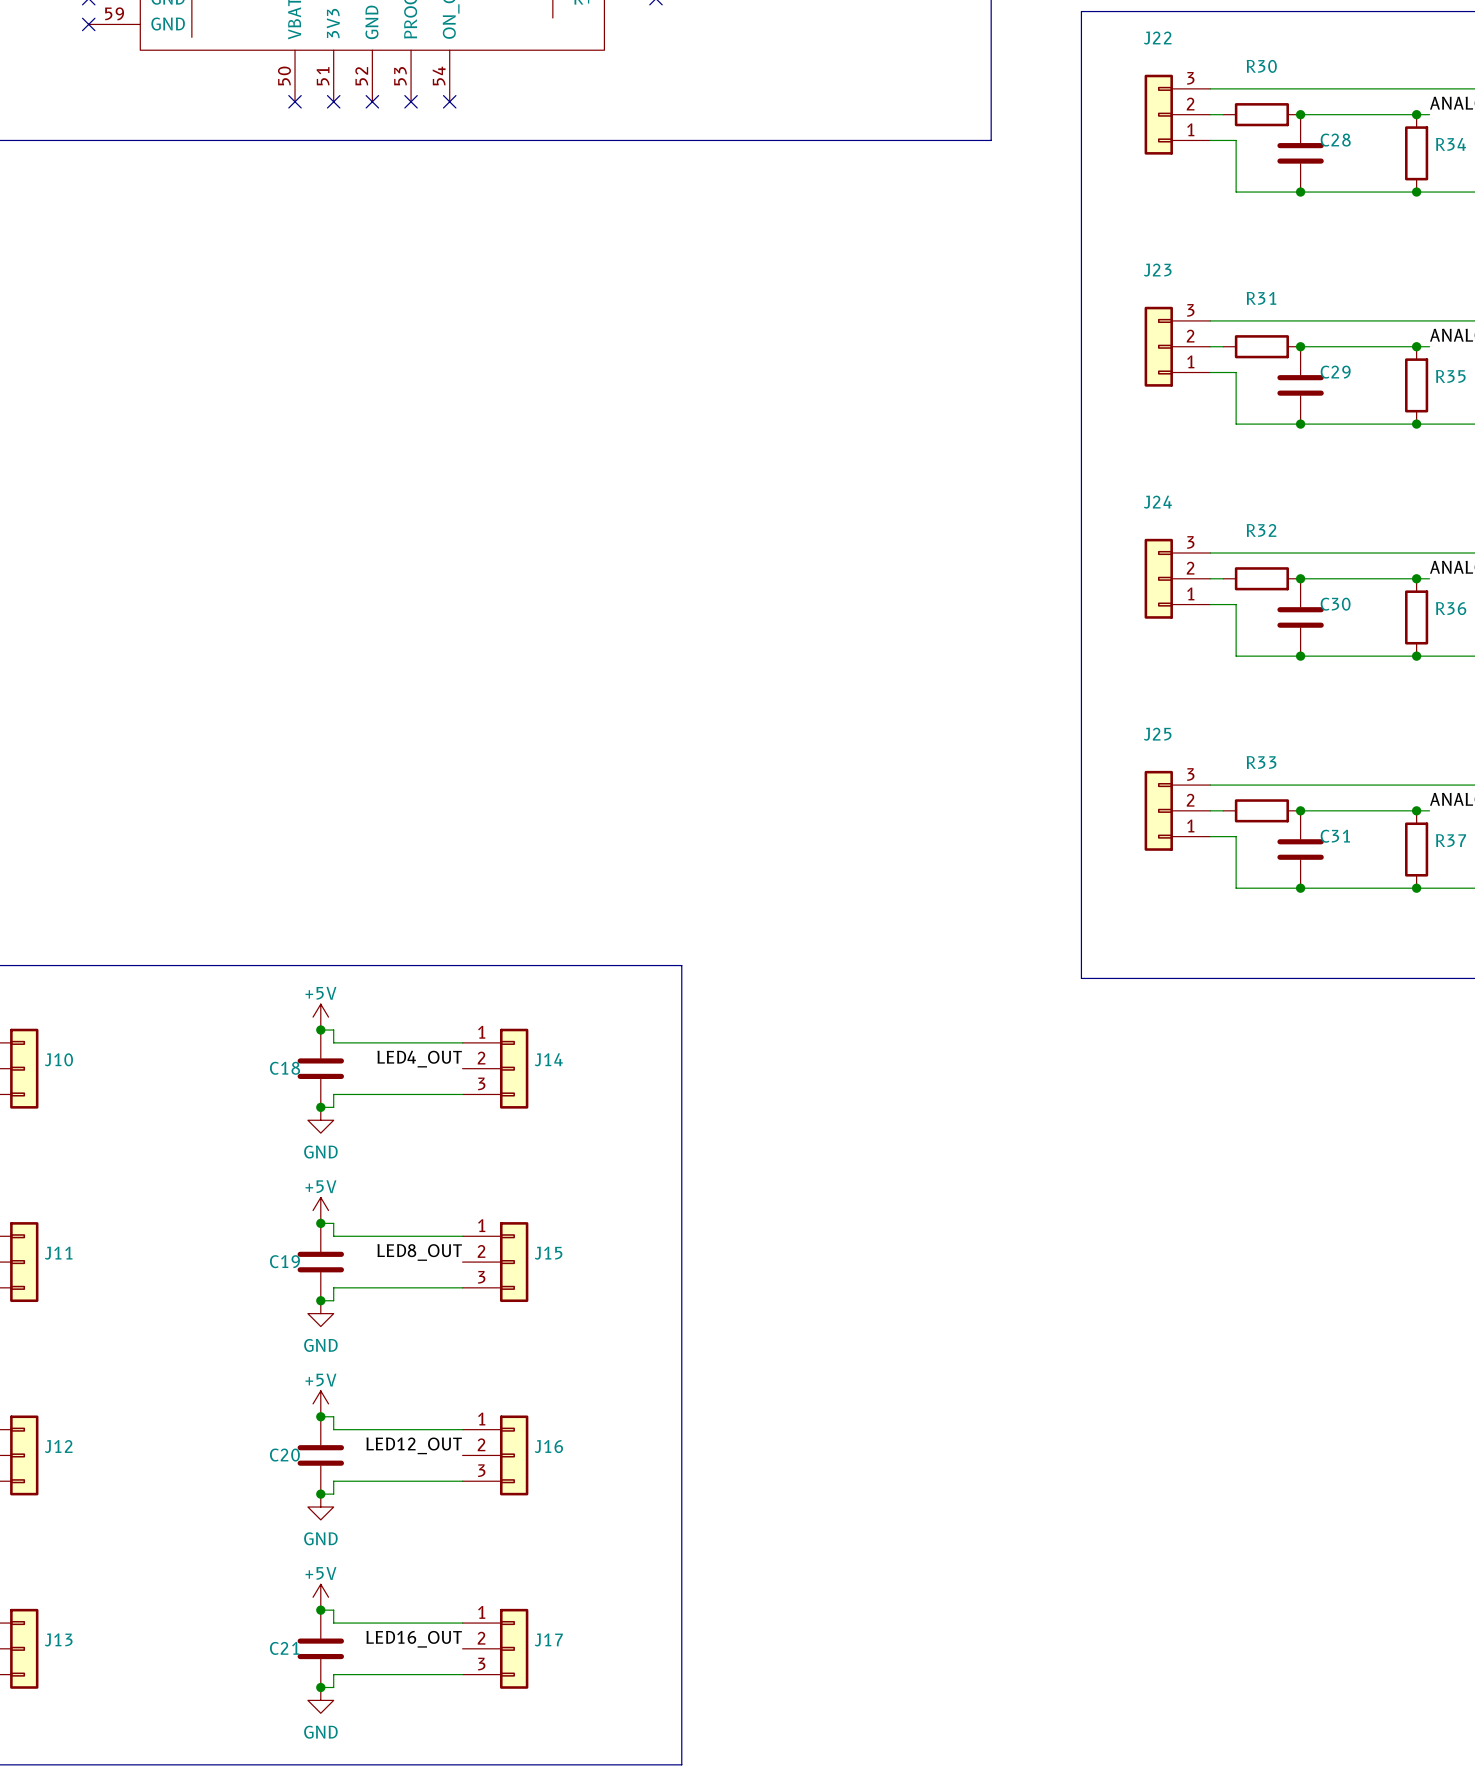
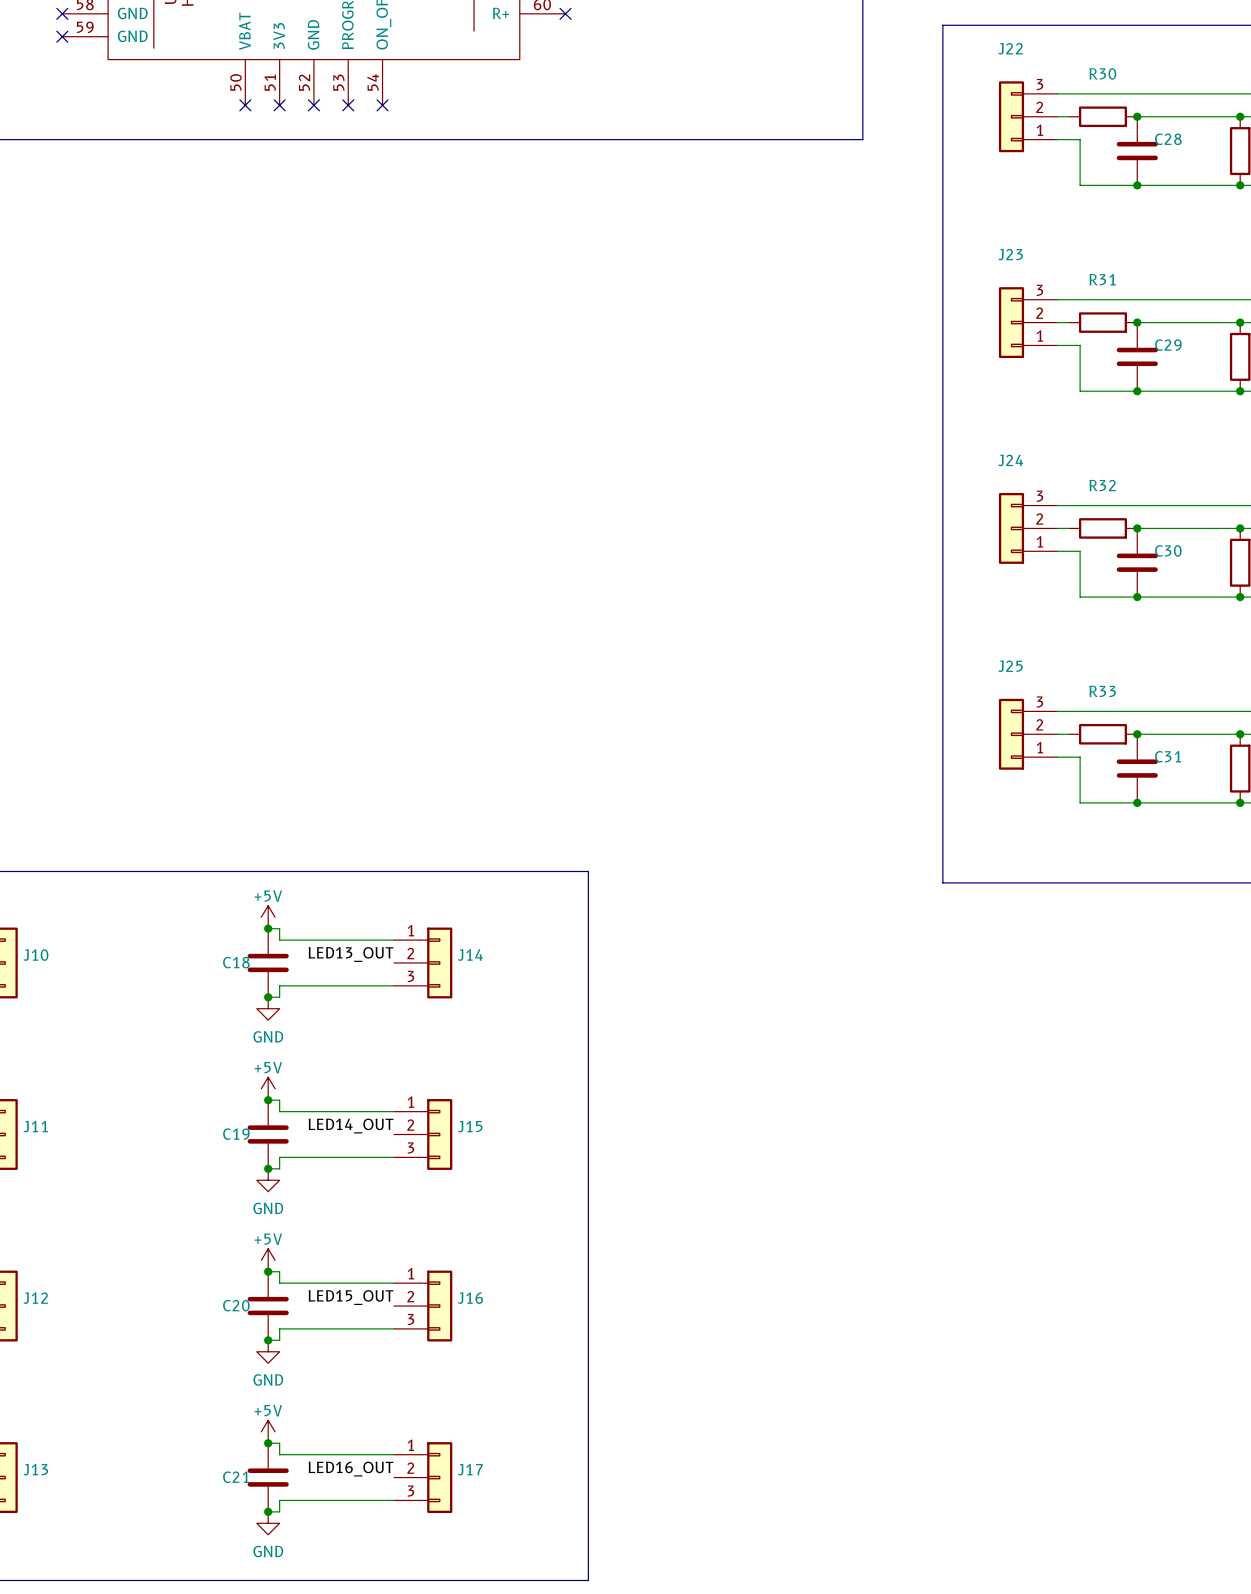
label: LED4_OUT (419, 1059) -> LED13_OUT (351, 954)
label: LED8_OUT (419, 1252) -> LED14_OUT (351, 1126)
label: LED12_OUT (414, 1445) -> LED15_OUT (351, 1297)

